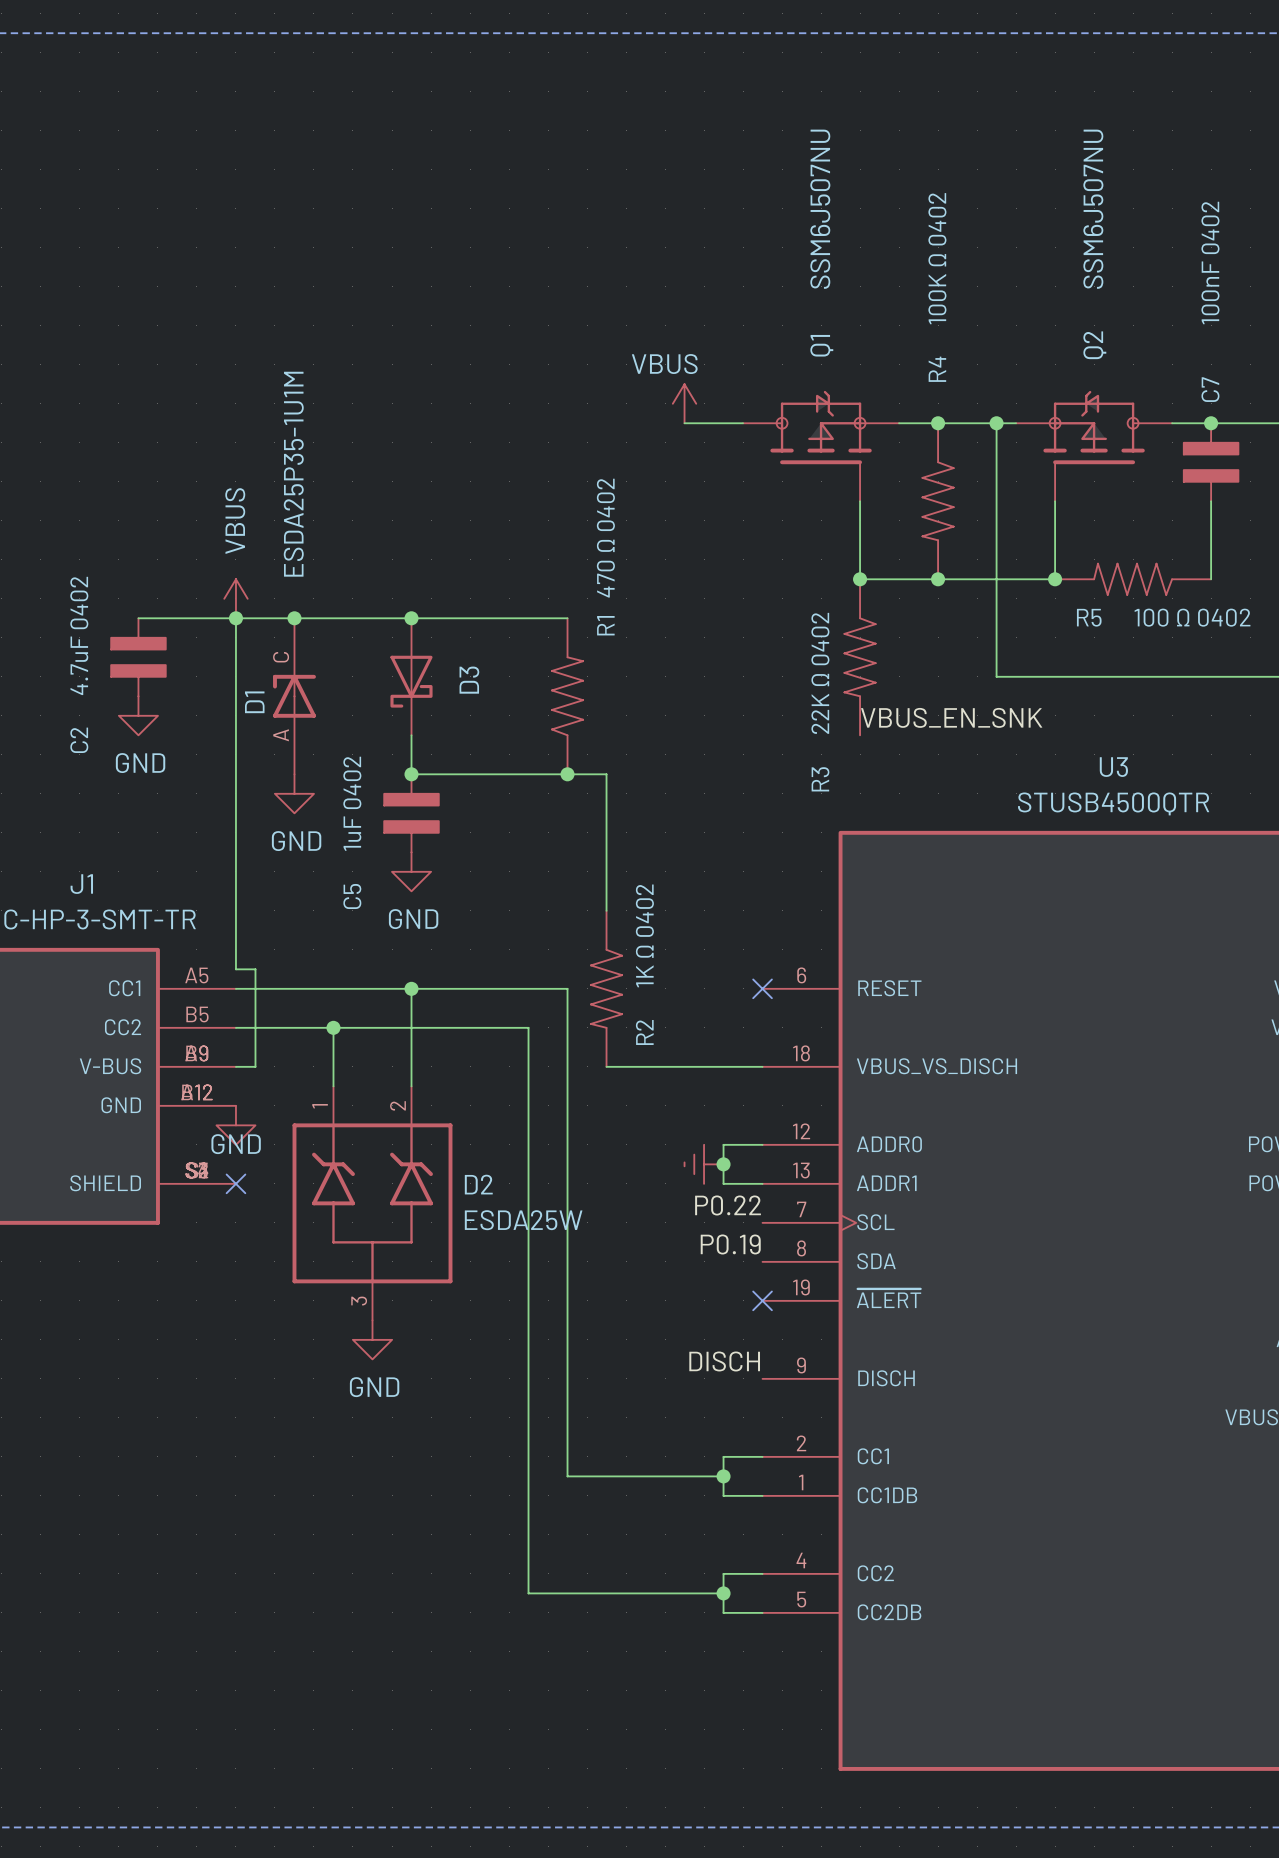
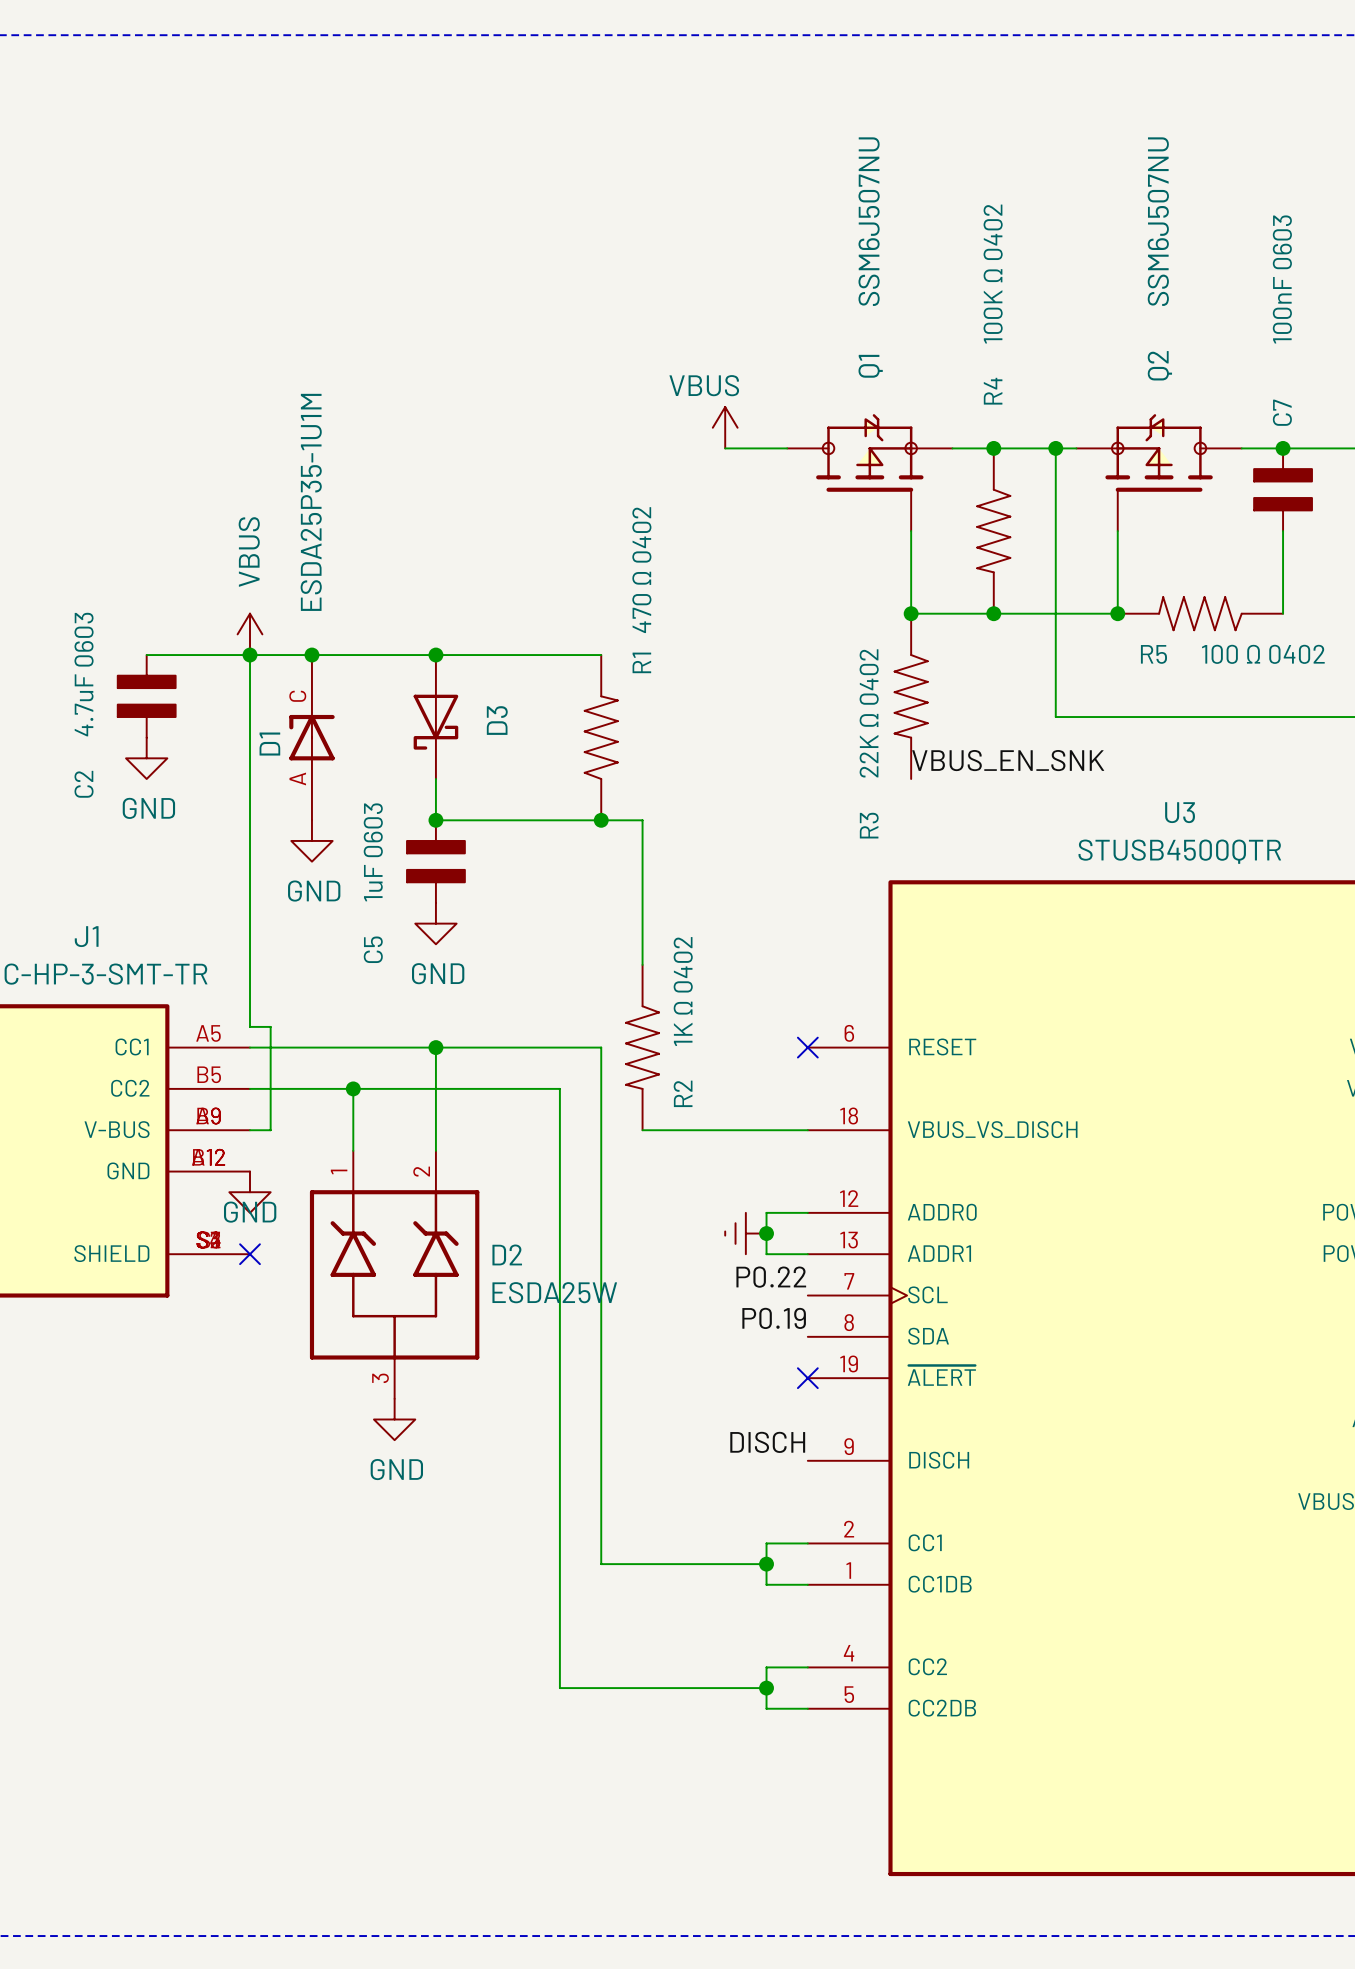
C7 value: 100nF 0402 (1210, 263) -> 100nF 0603 (1282, 279)
C2 value: 4.7uF 0402 (79, 635) -> 4.7uF 0603 (84, 674)
C5 value: 1uF 0402 (352, 803) -> 1uF 0603 (373, 852)

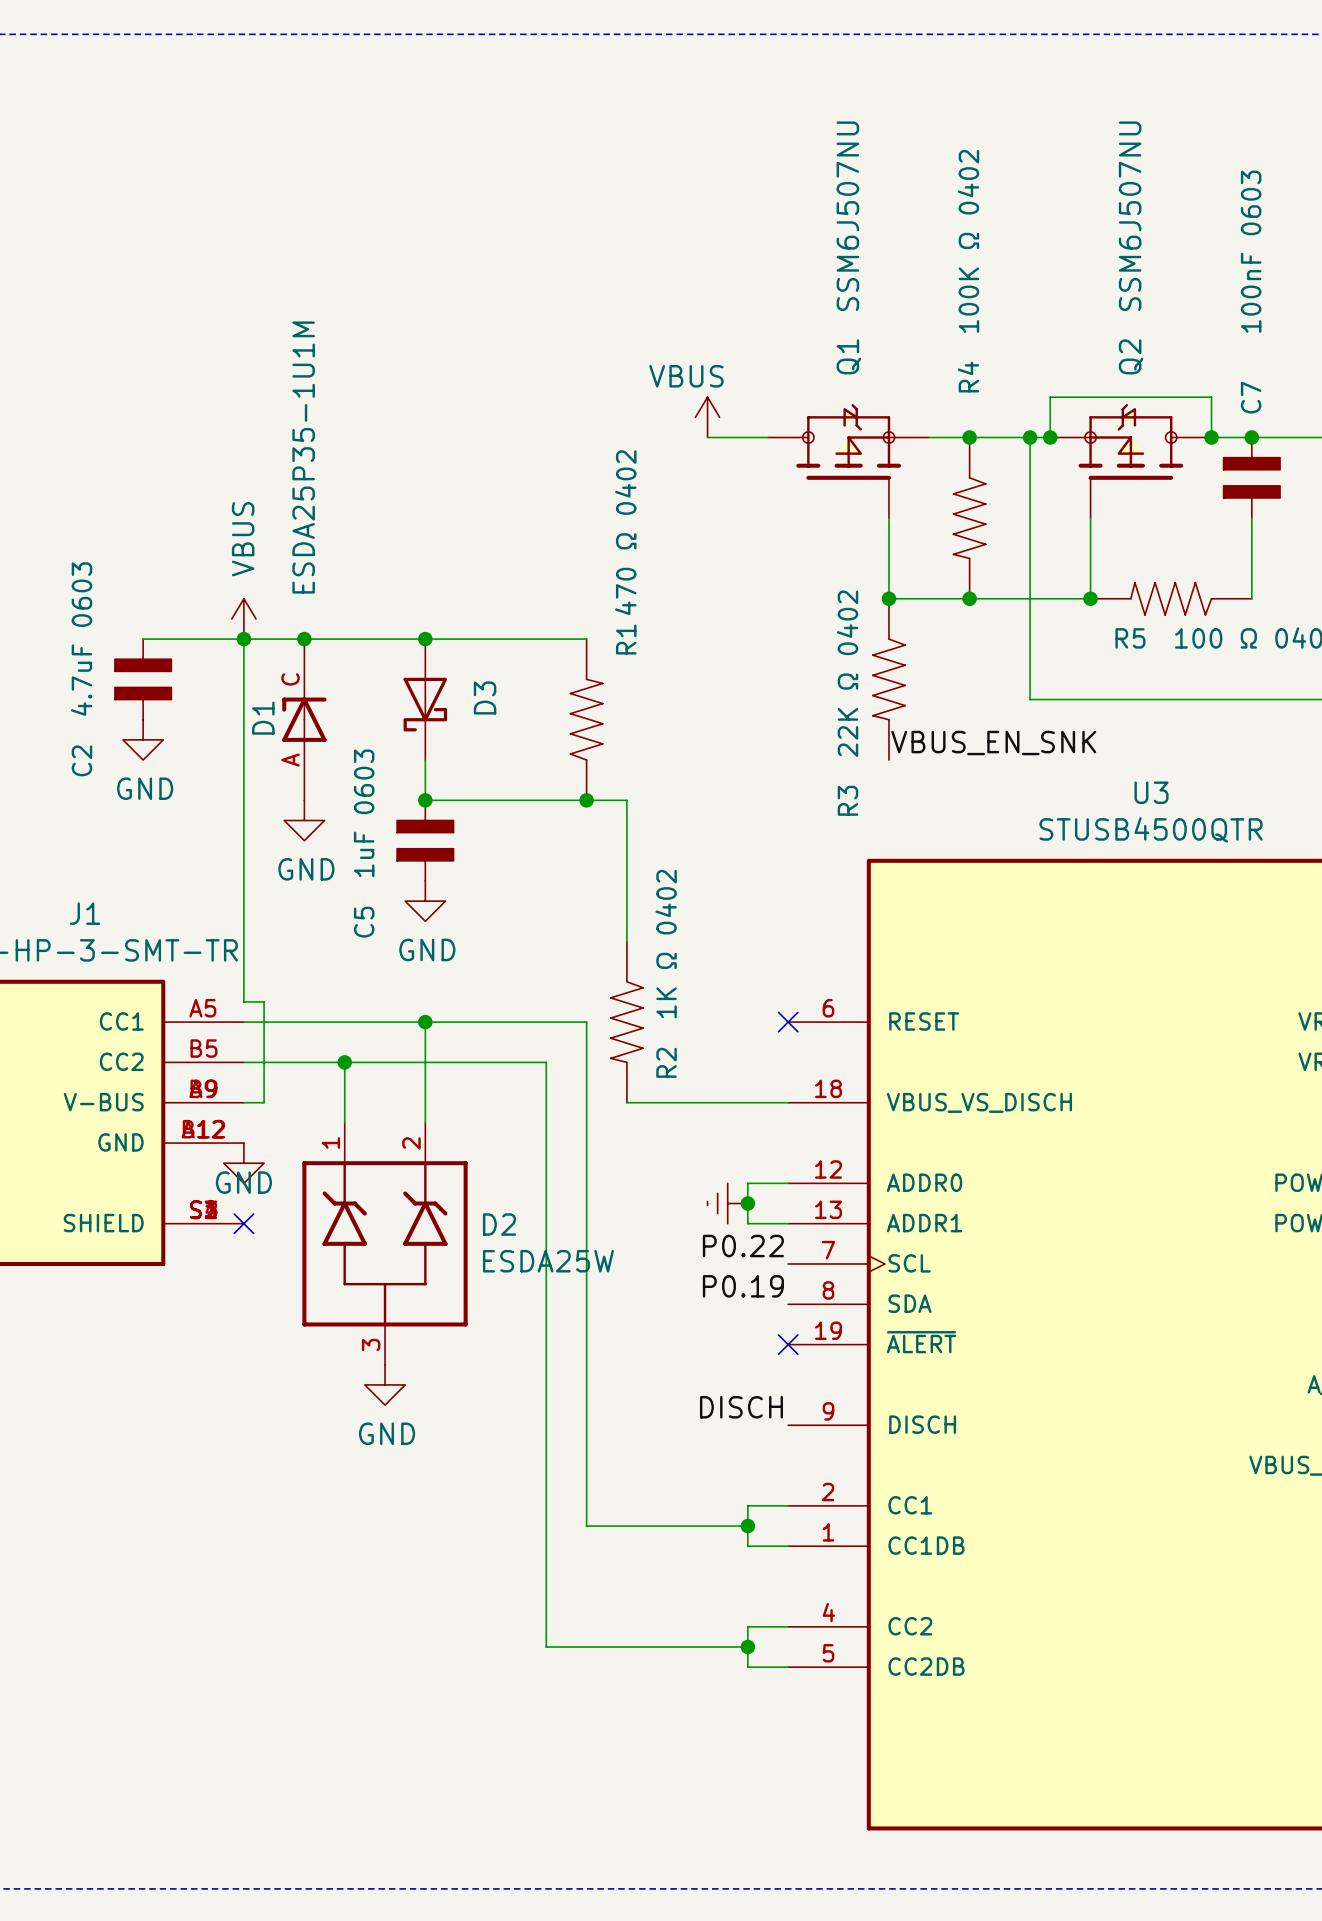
wire: none -> (1050, 437) (1050, 397) (1211, 397) (1211, 437)
junction: none -> (1050, 437)
junction: none -> (1211, 437)

